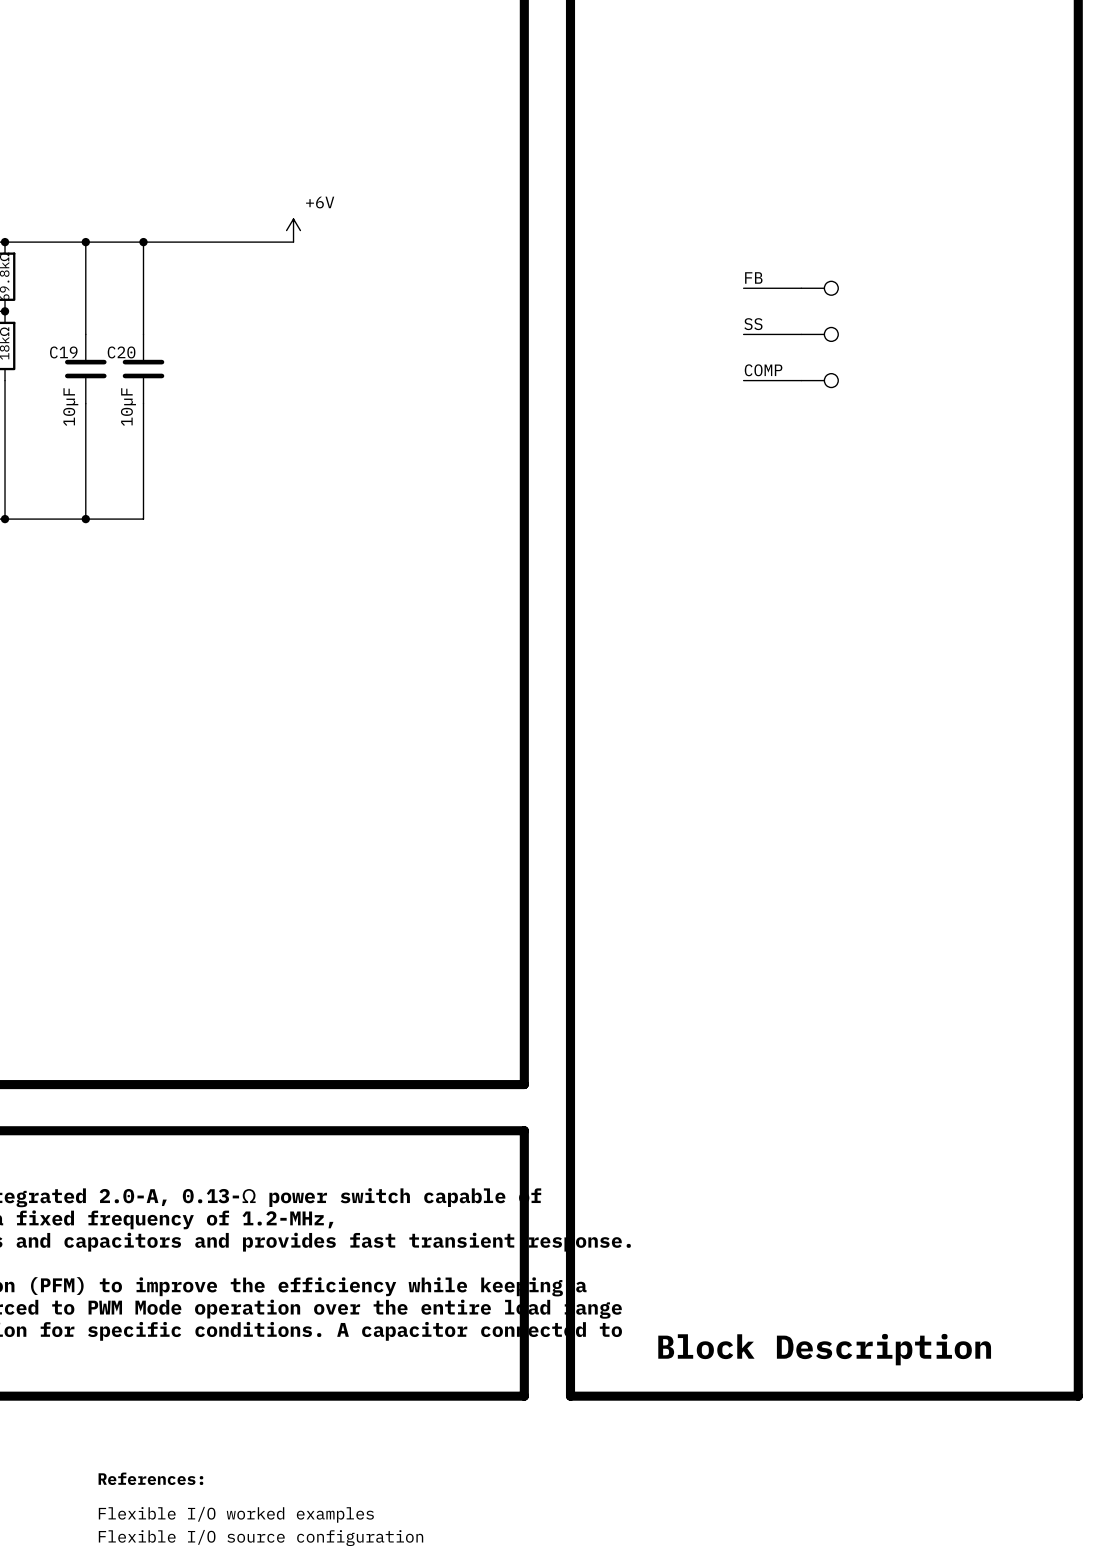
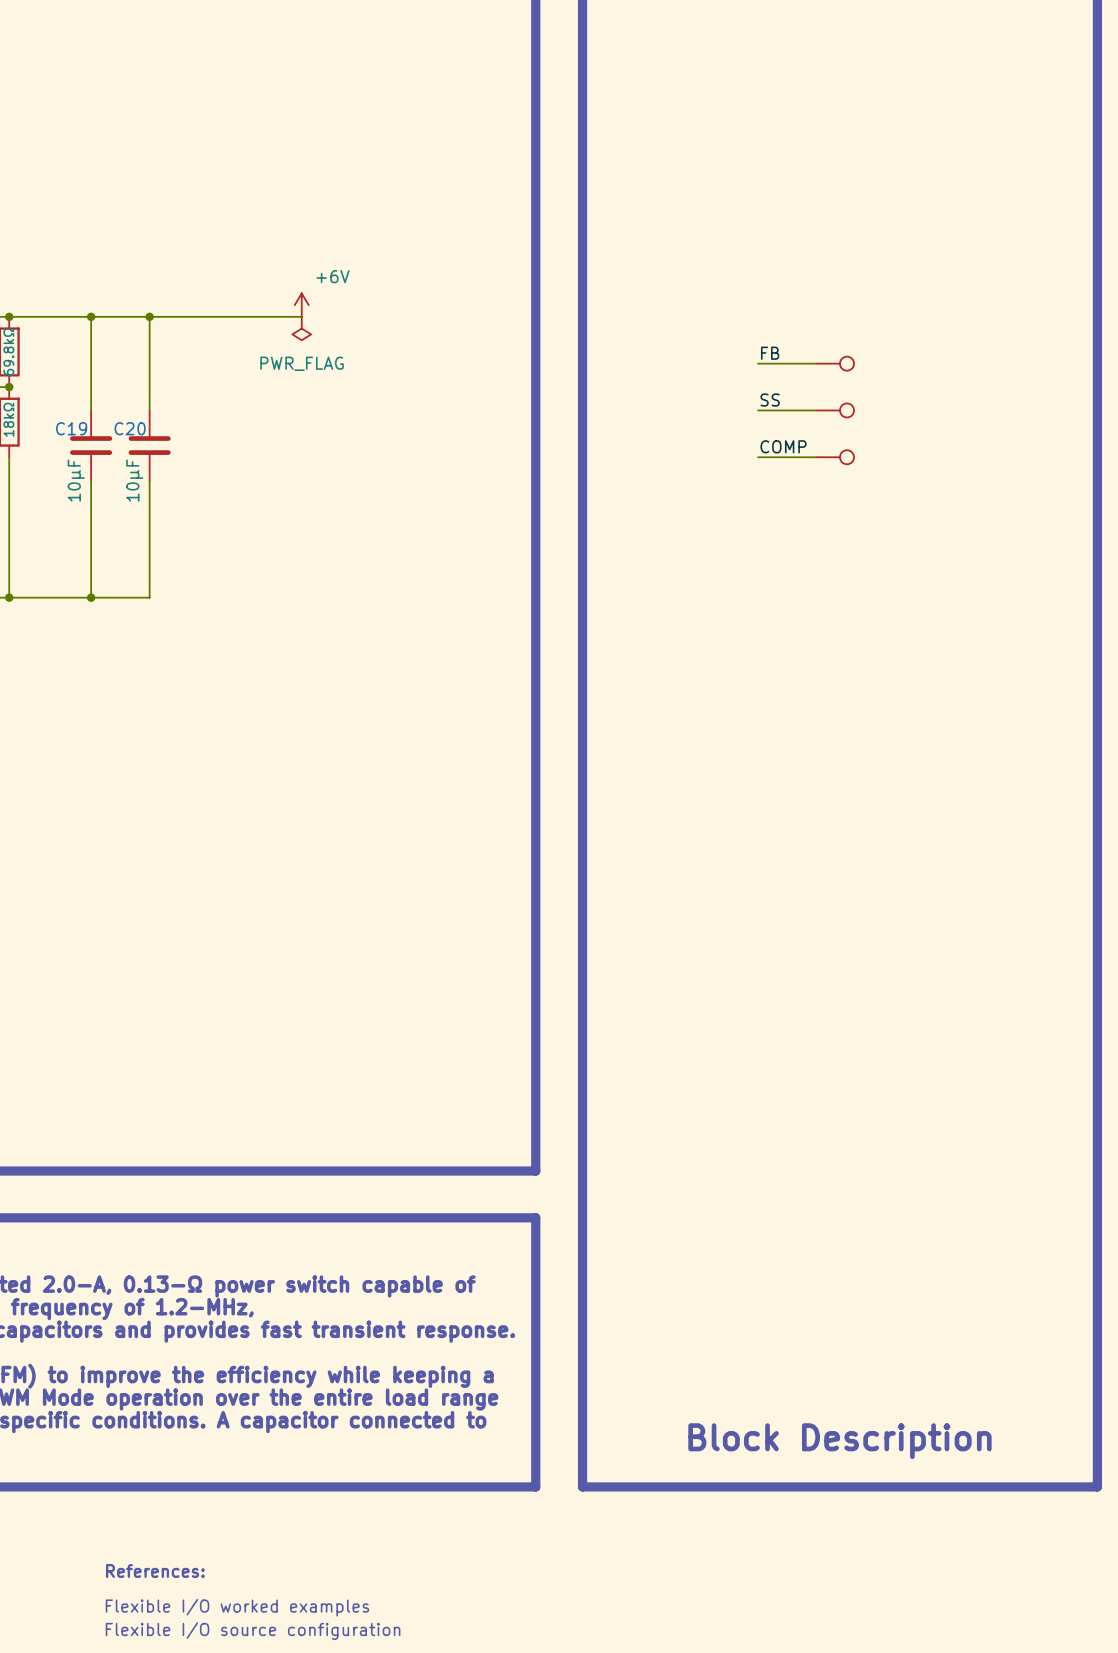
power symbol: none -> PWR_FLAG (301, 328)

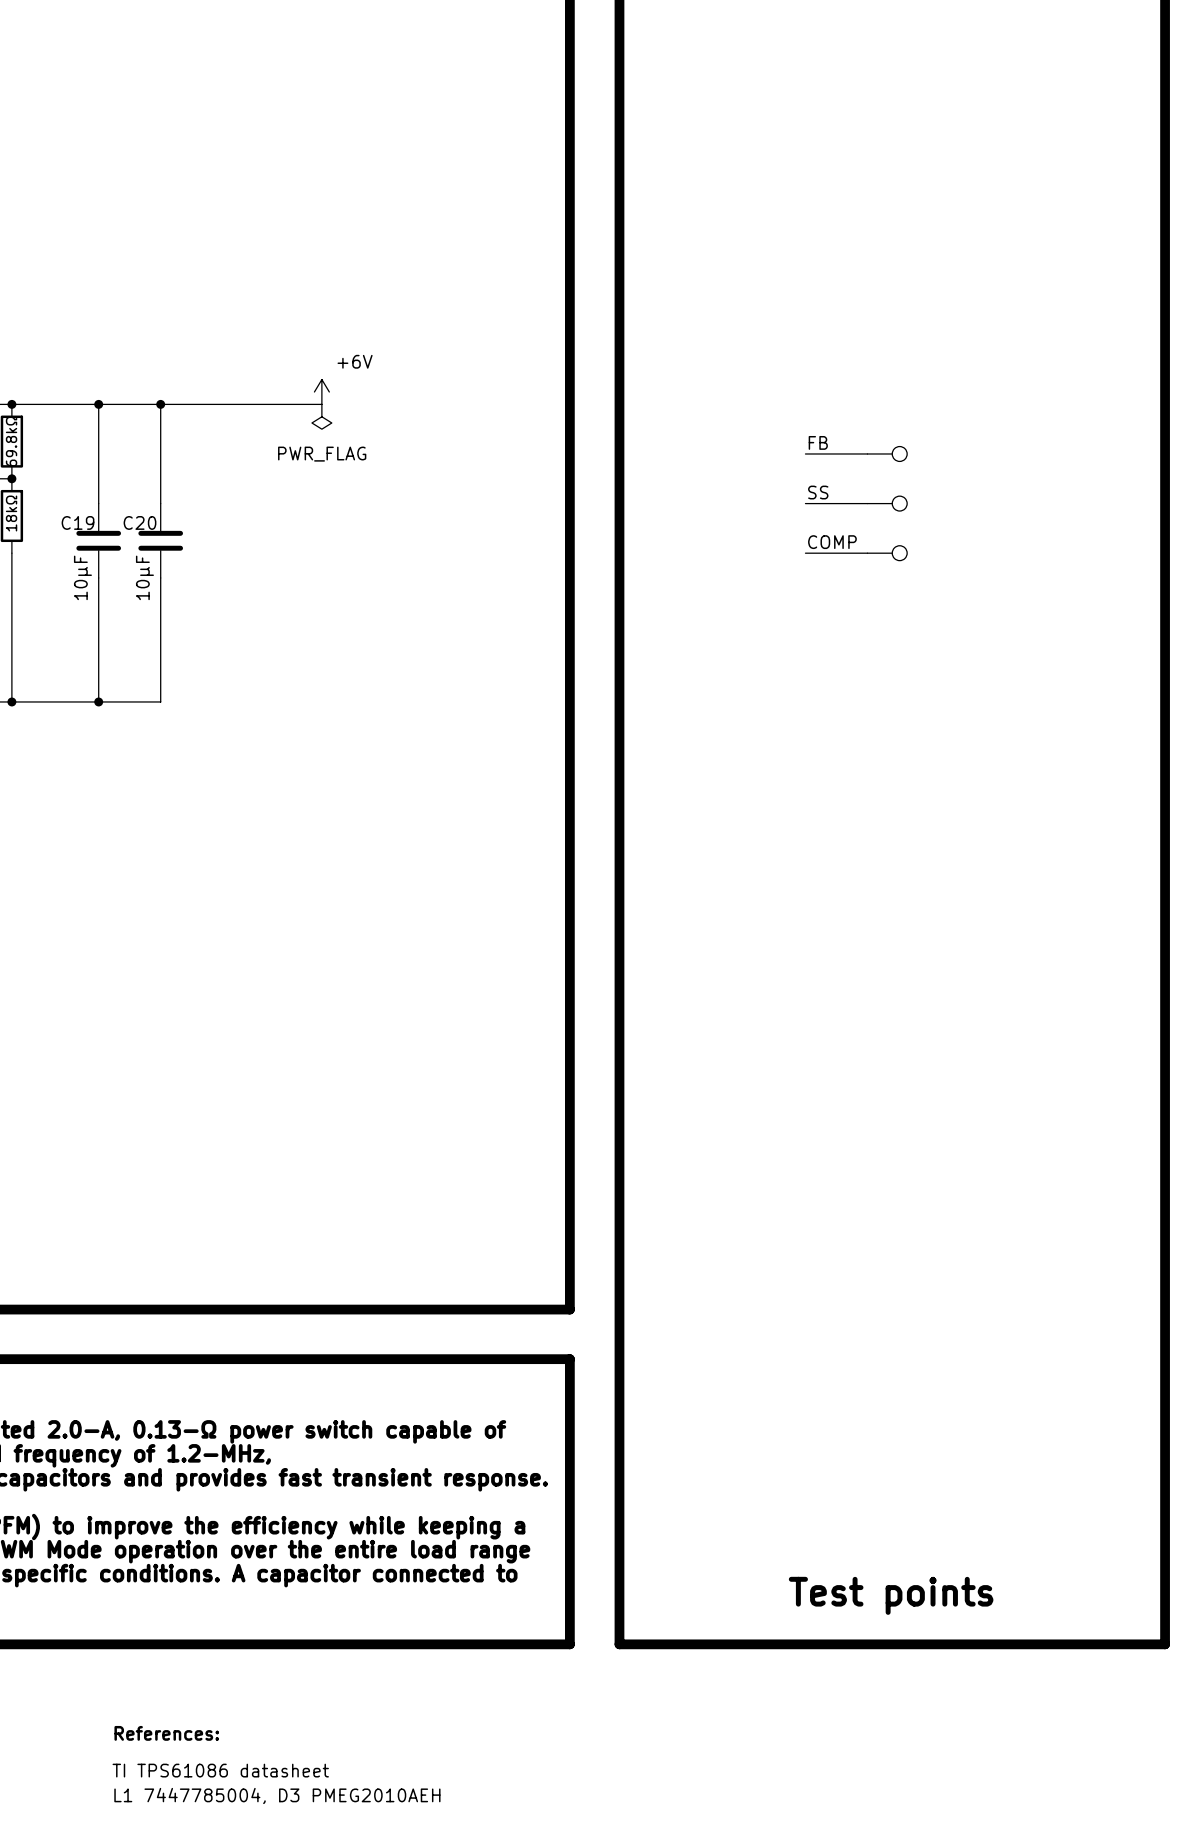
text: Block Description (839, 1441) -> Test points (891, 1595)
text: Flexible I/O worked examples (237, 1607) -> TI TPS61086 datasheet (220, 1770)
text: Flexible I/O source configuration (253, 1631) -> L1 7447785004, D3 PMEG2010AEH (277, 1795)

